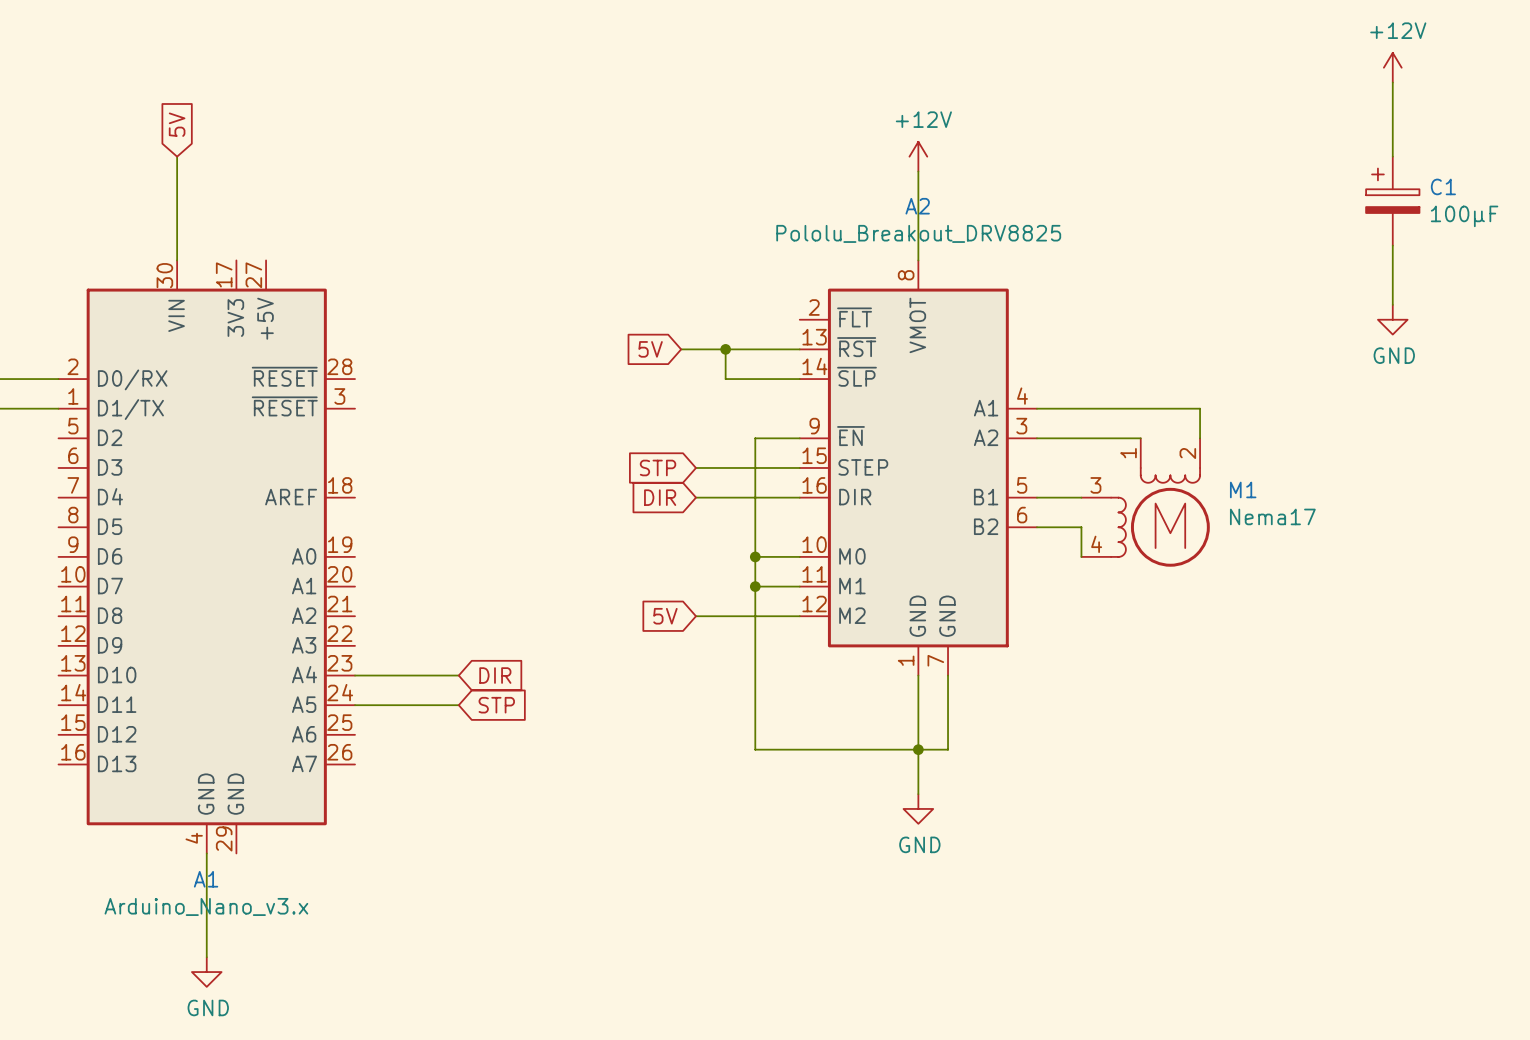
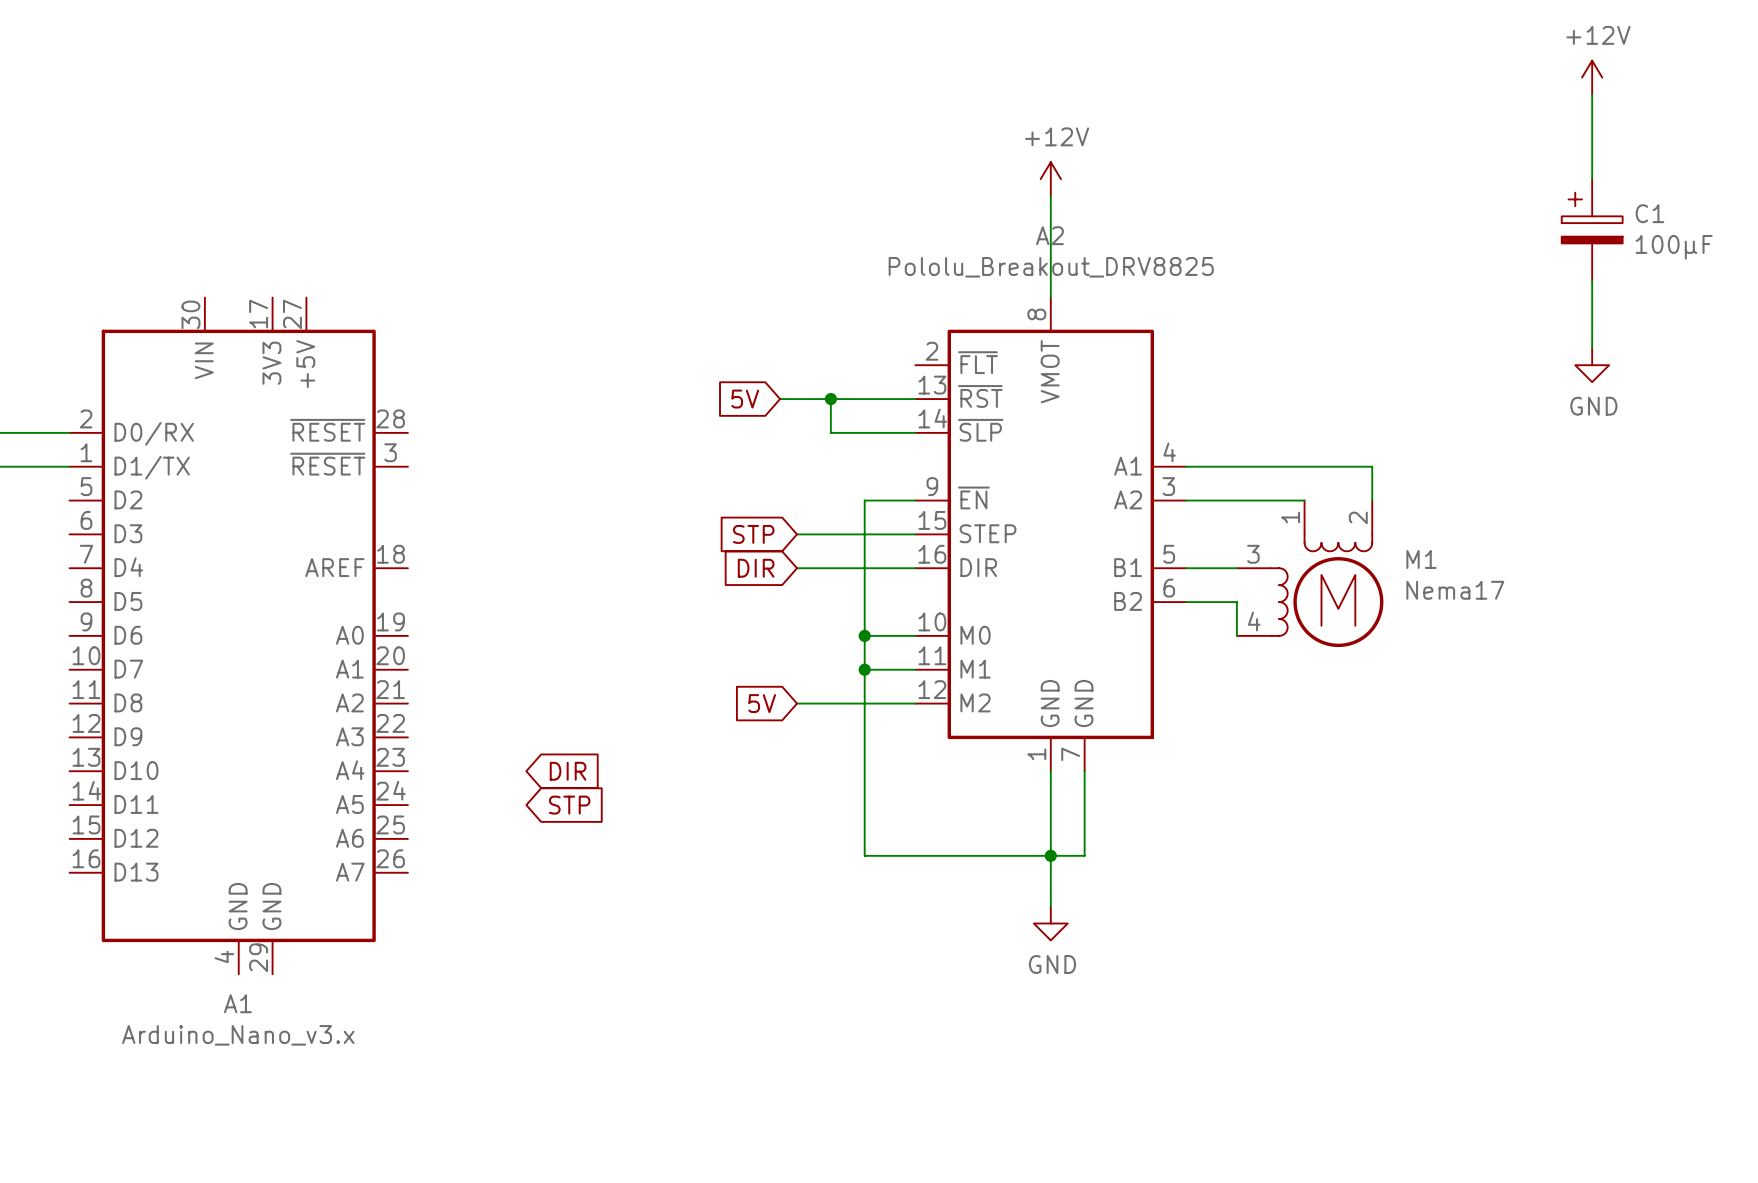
global label: 5V (177, 124) -> none
wire: (177, 156) (177, 260) -> none
wire: (355, 675) (458, 675) -> none
wire: (355, 705) (458, 705) -> none
wire: (206, 853) (206, 957) -> none
power symbol: GND (206, 972) -> none

